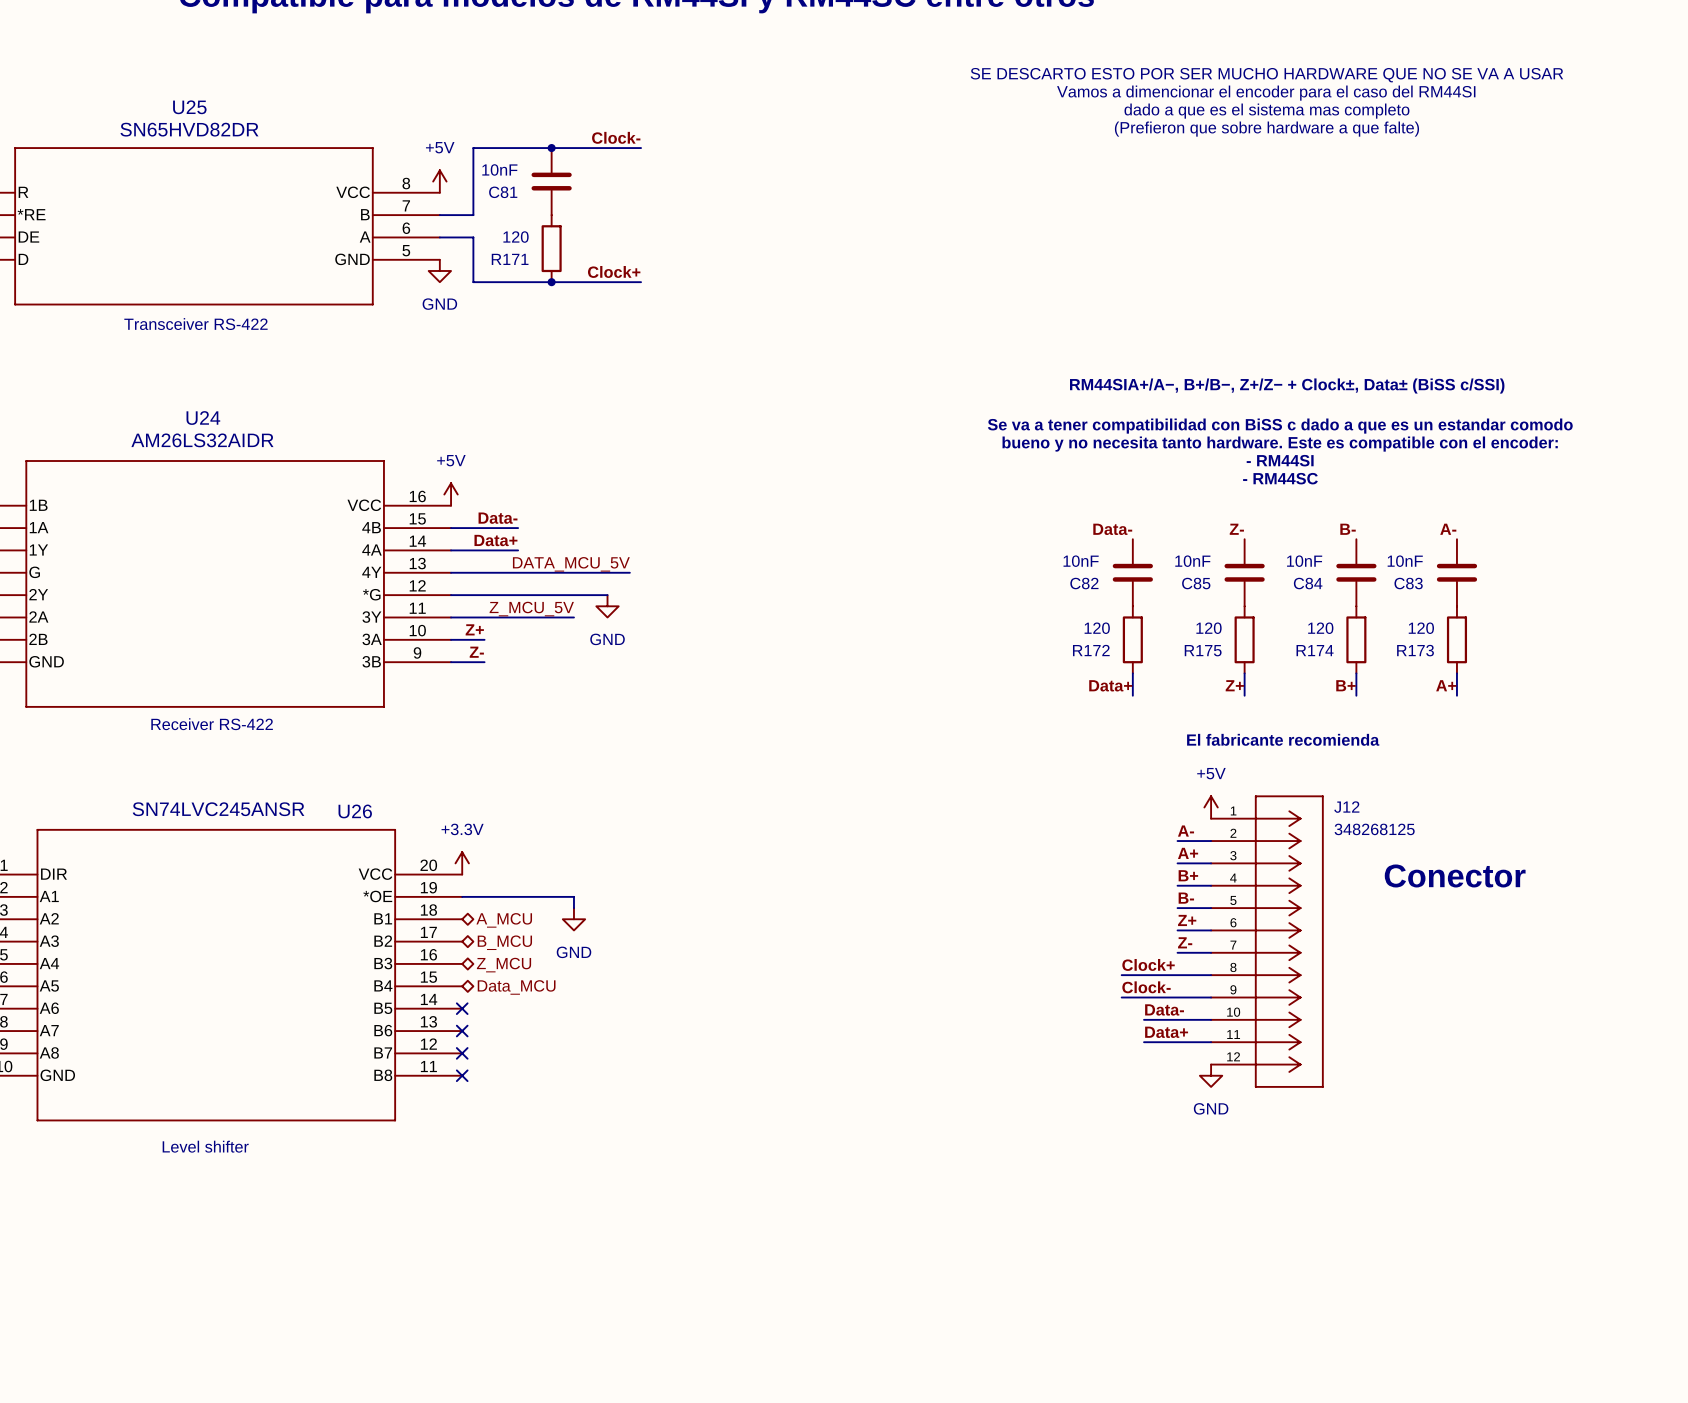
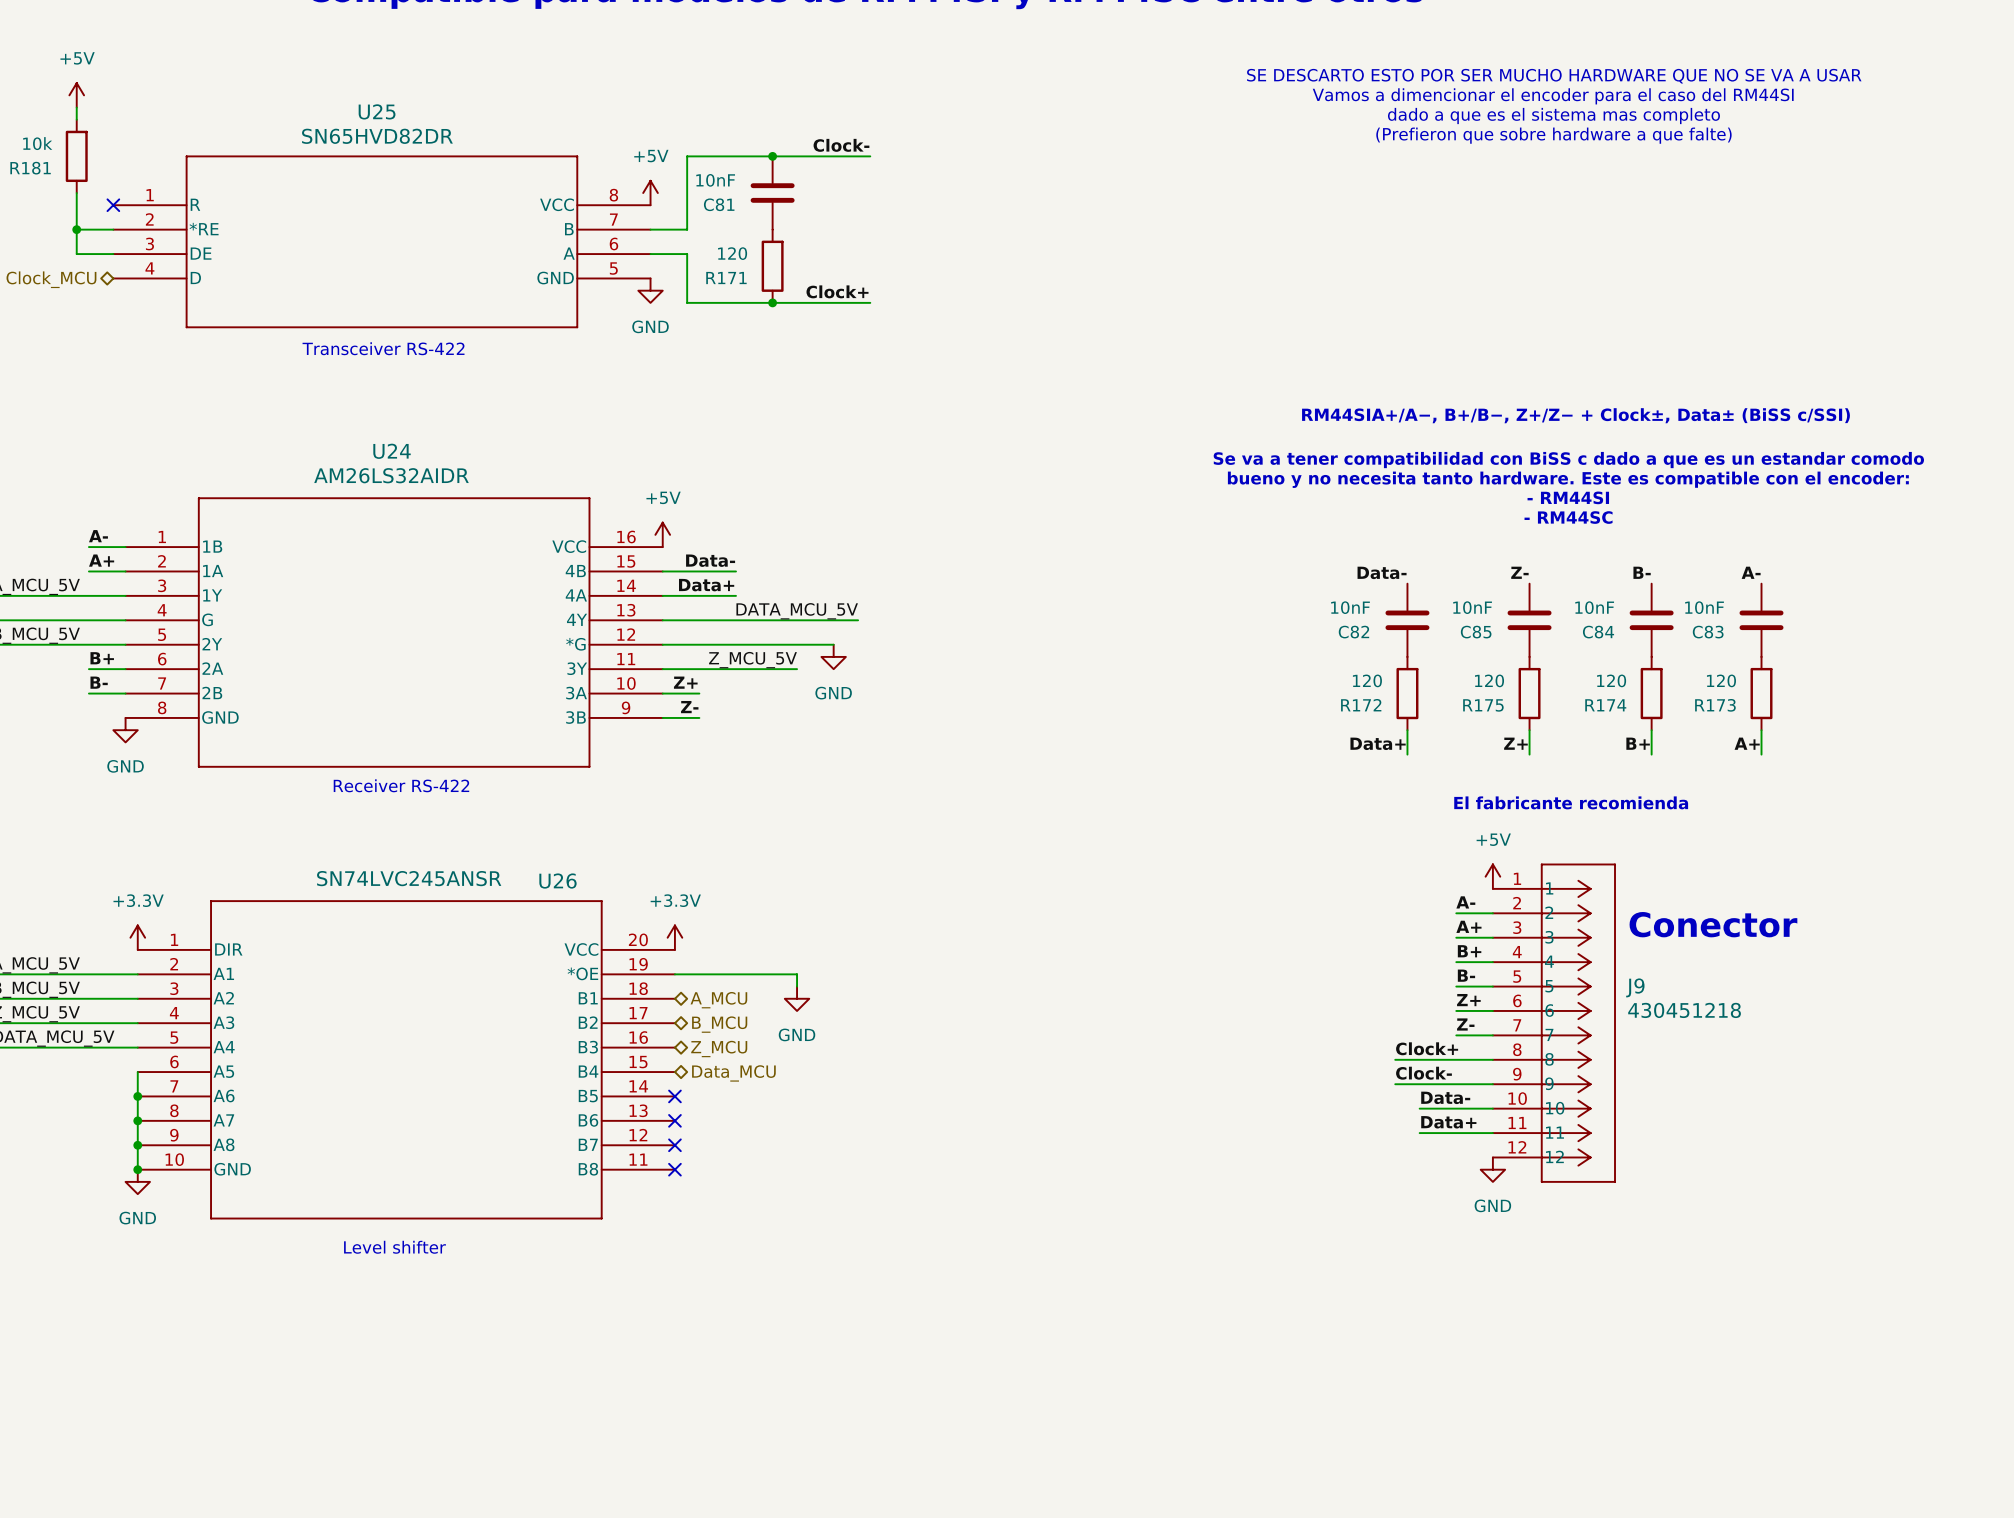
text position: Conector (1455, 875) -> Conector (1713, 924)
J12: 348268125 (1267, 941) -> none
J9: none -> 430451218 (1554, 1023)

